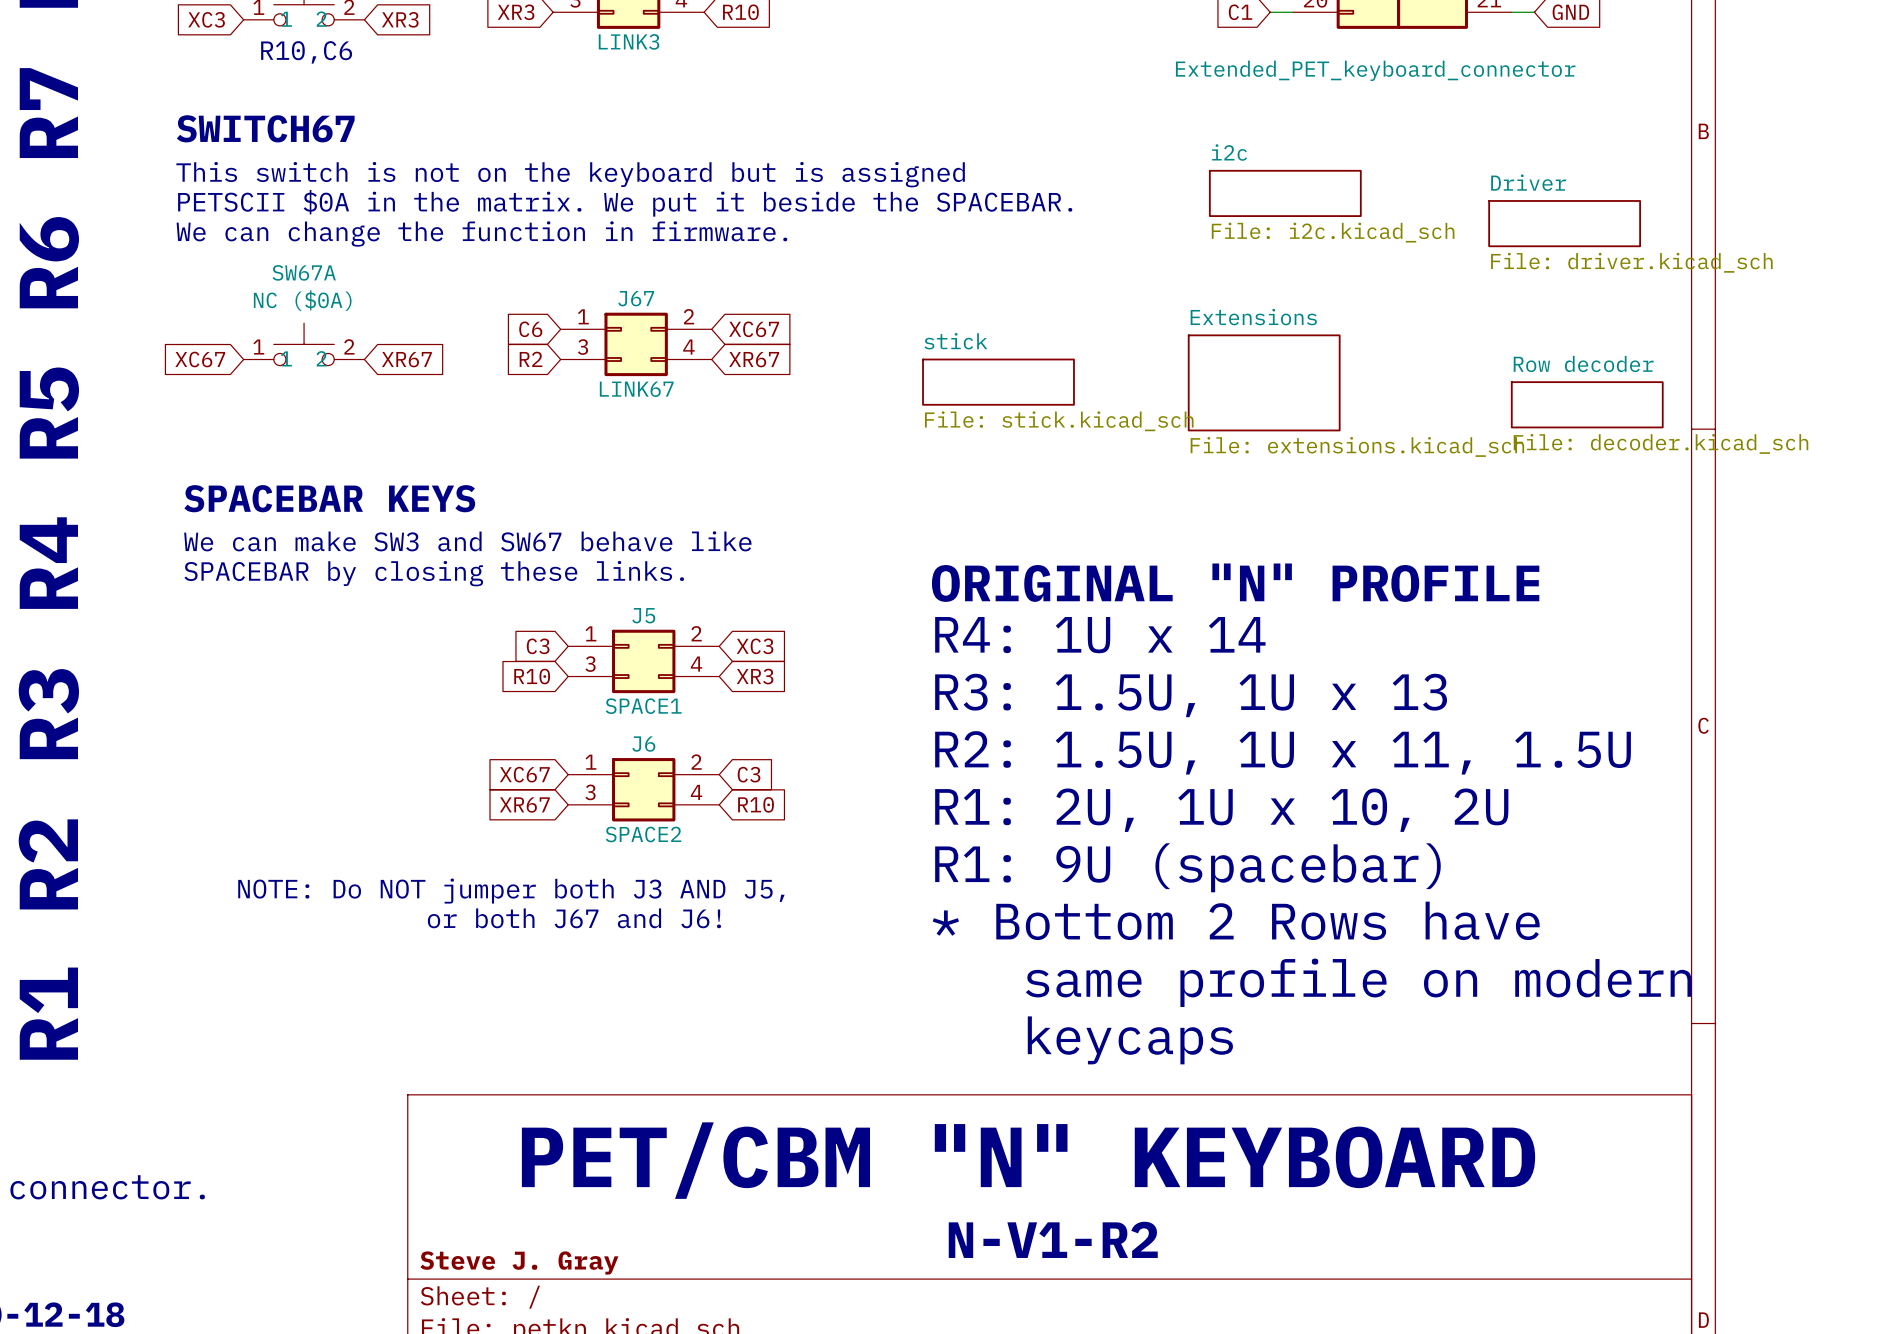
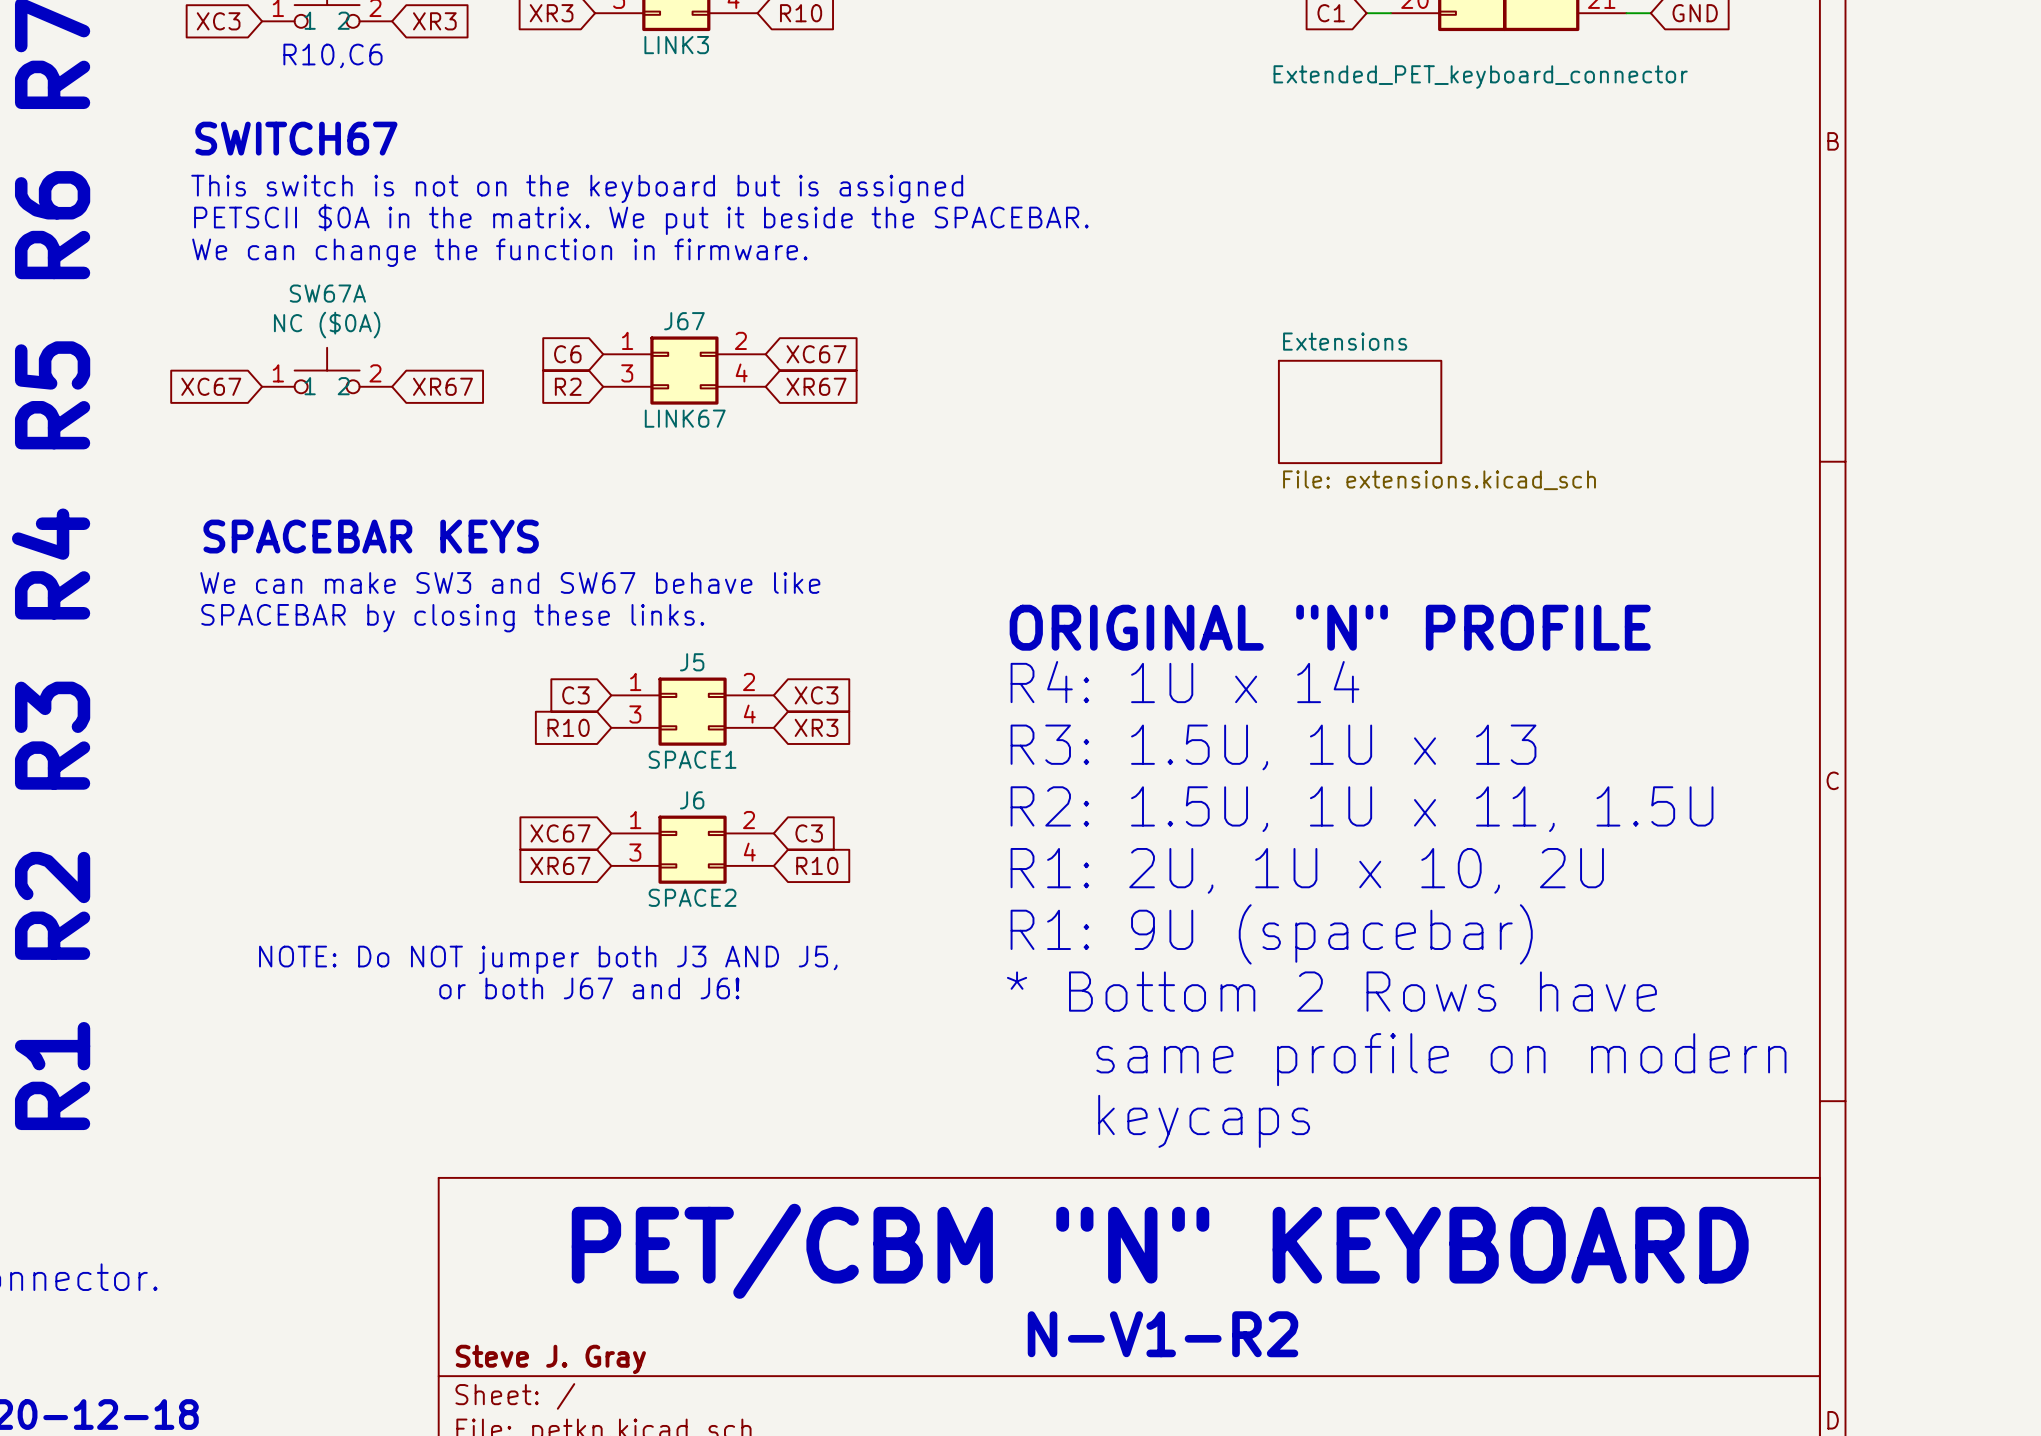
sheet i2c: File: i2c.kicad_sch (1285, 193) -> none
sheet Driver: File: driver.kicad_sch (1564, 223) -> none
sheet stick: File: stick.kicad_sch (998, 382) -> none
sheet Row decoder: File: decoder.kicad_sch (1587, 404) -> none

